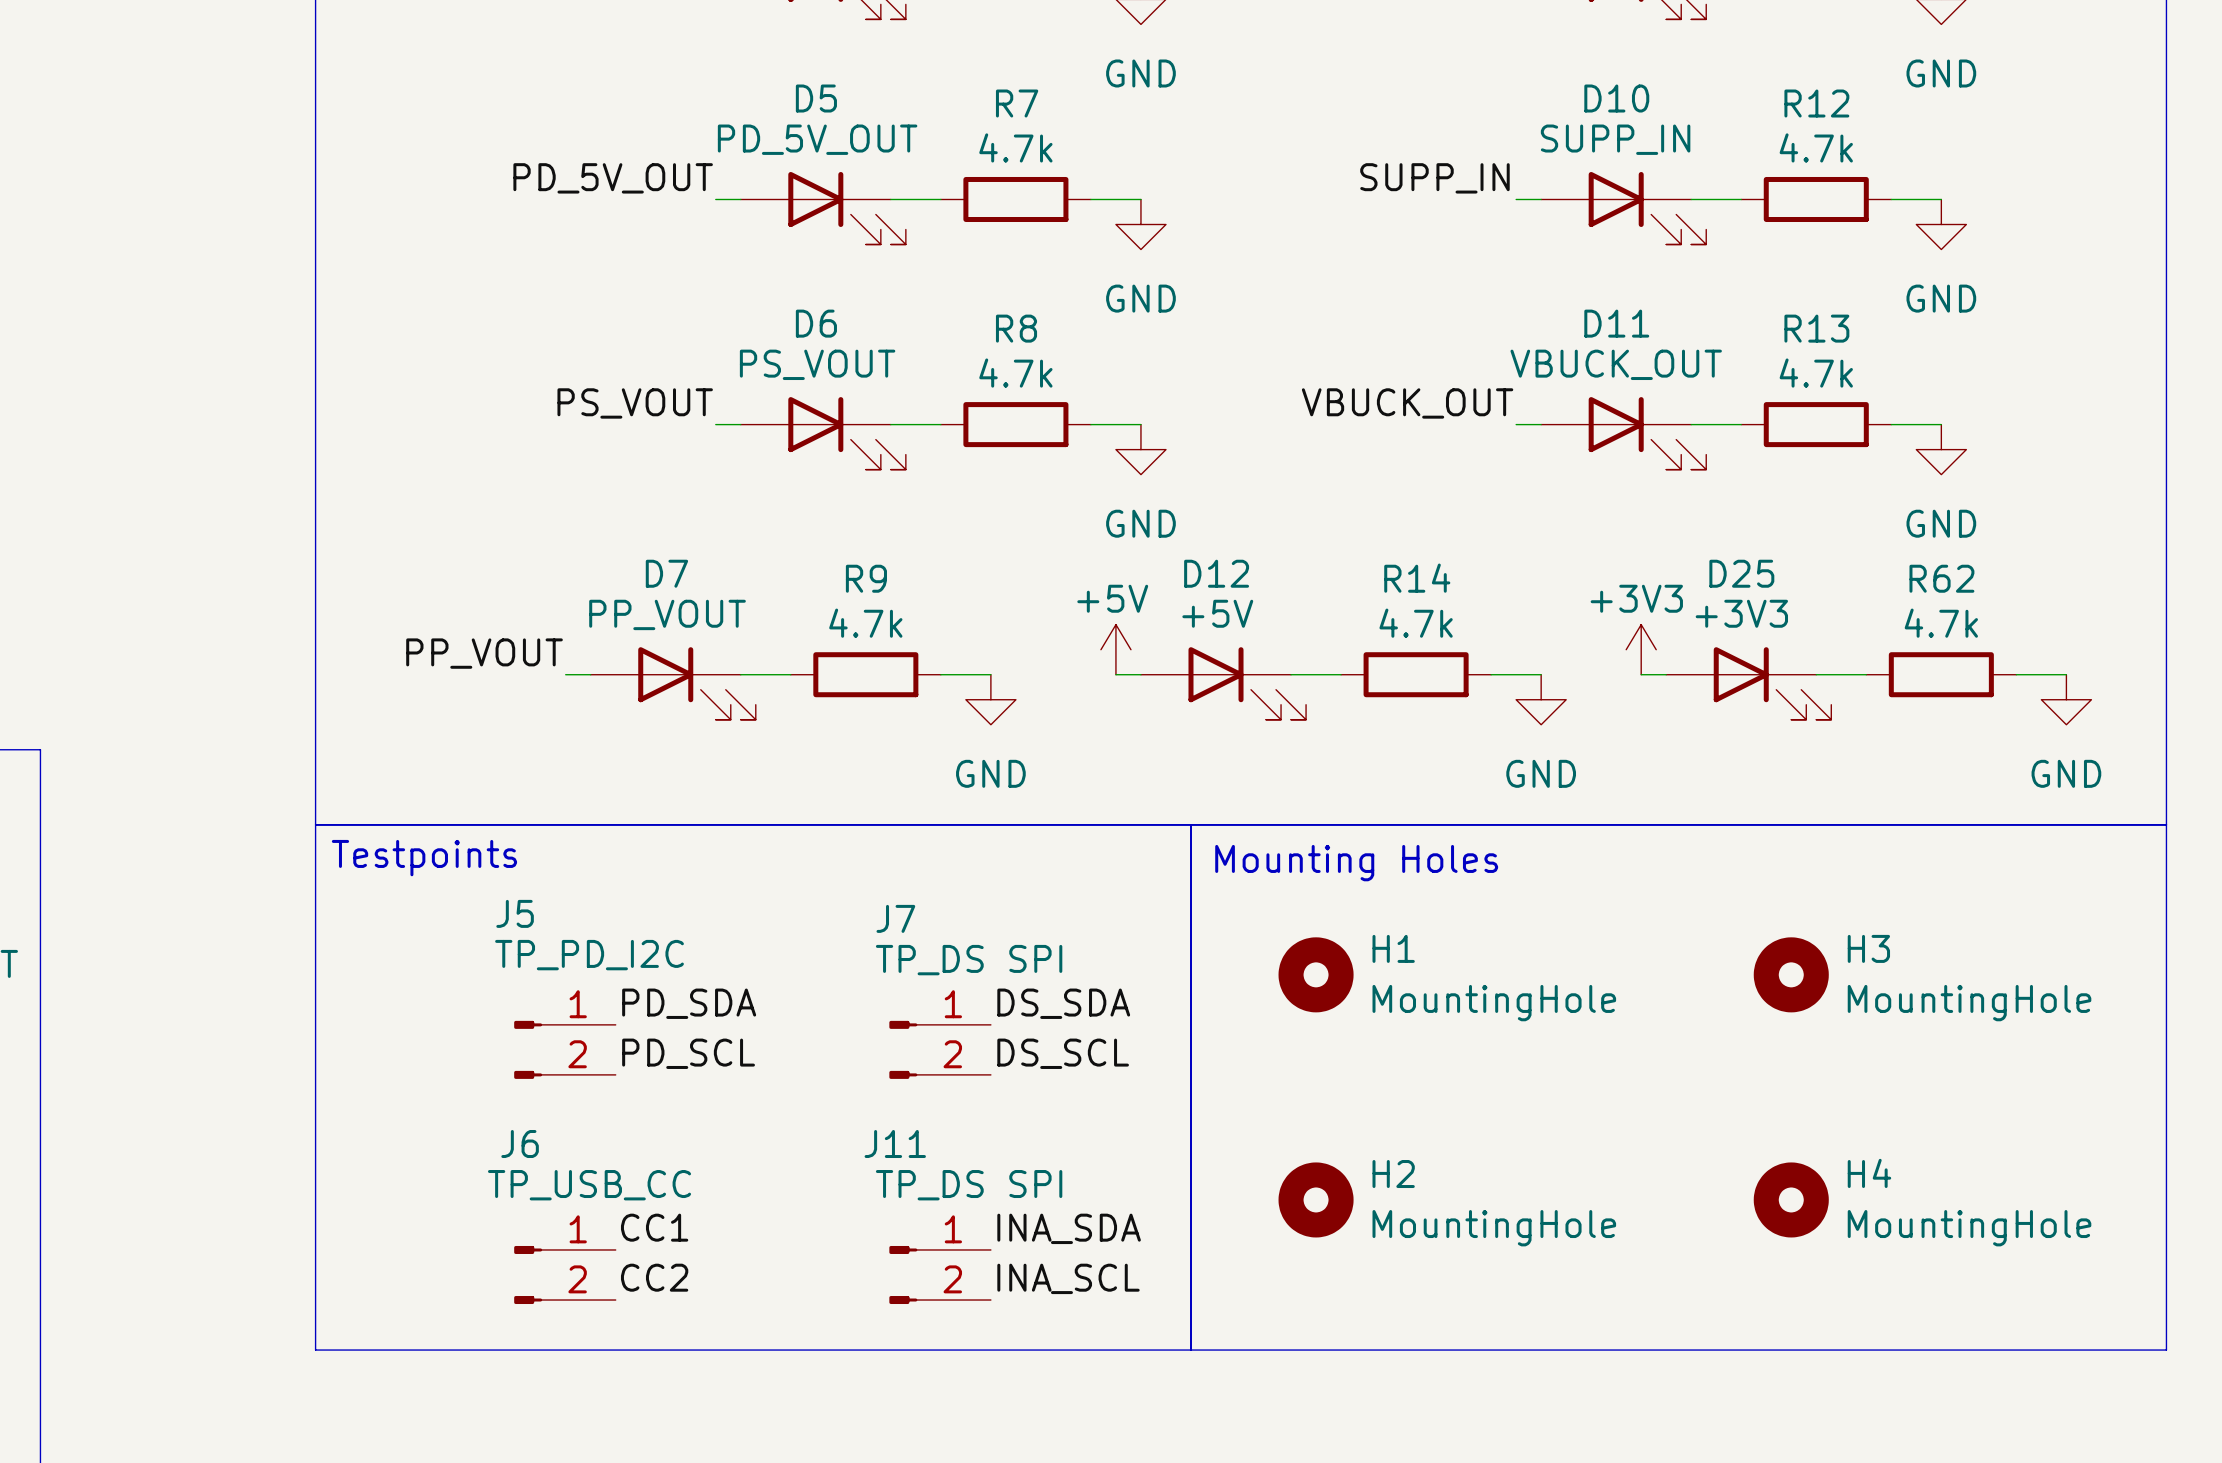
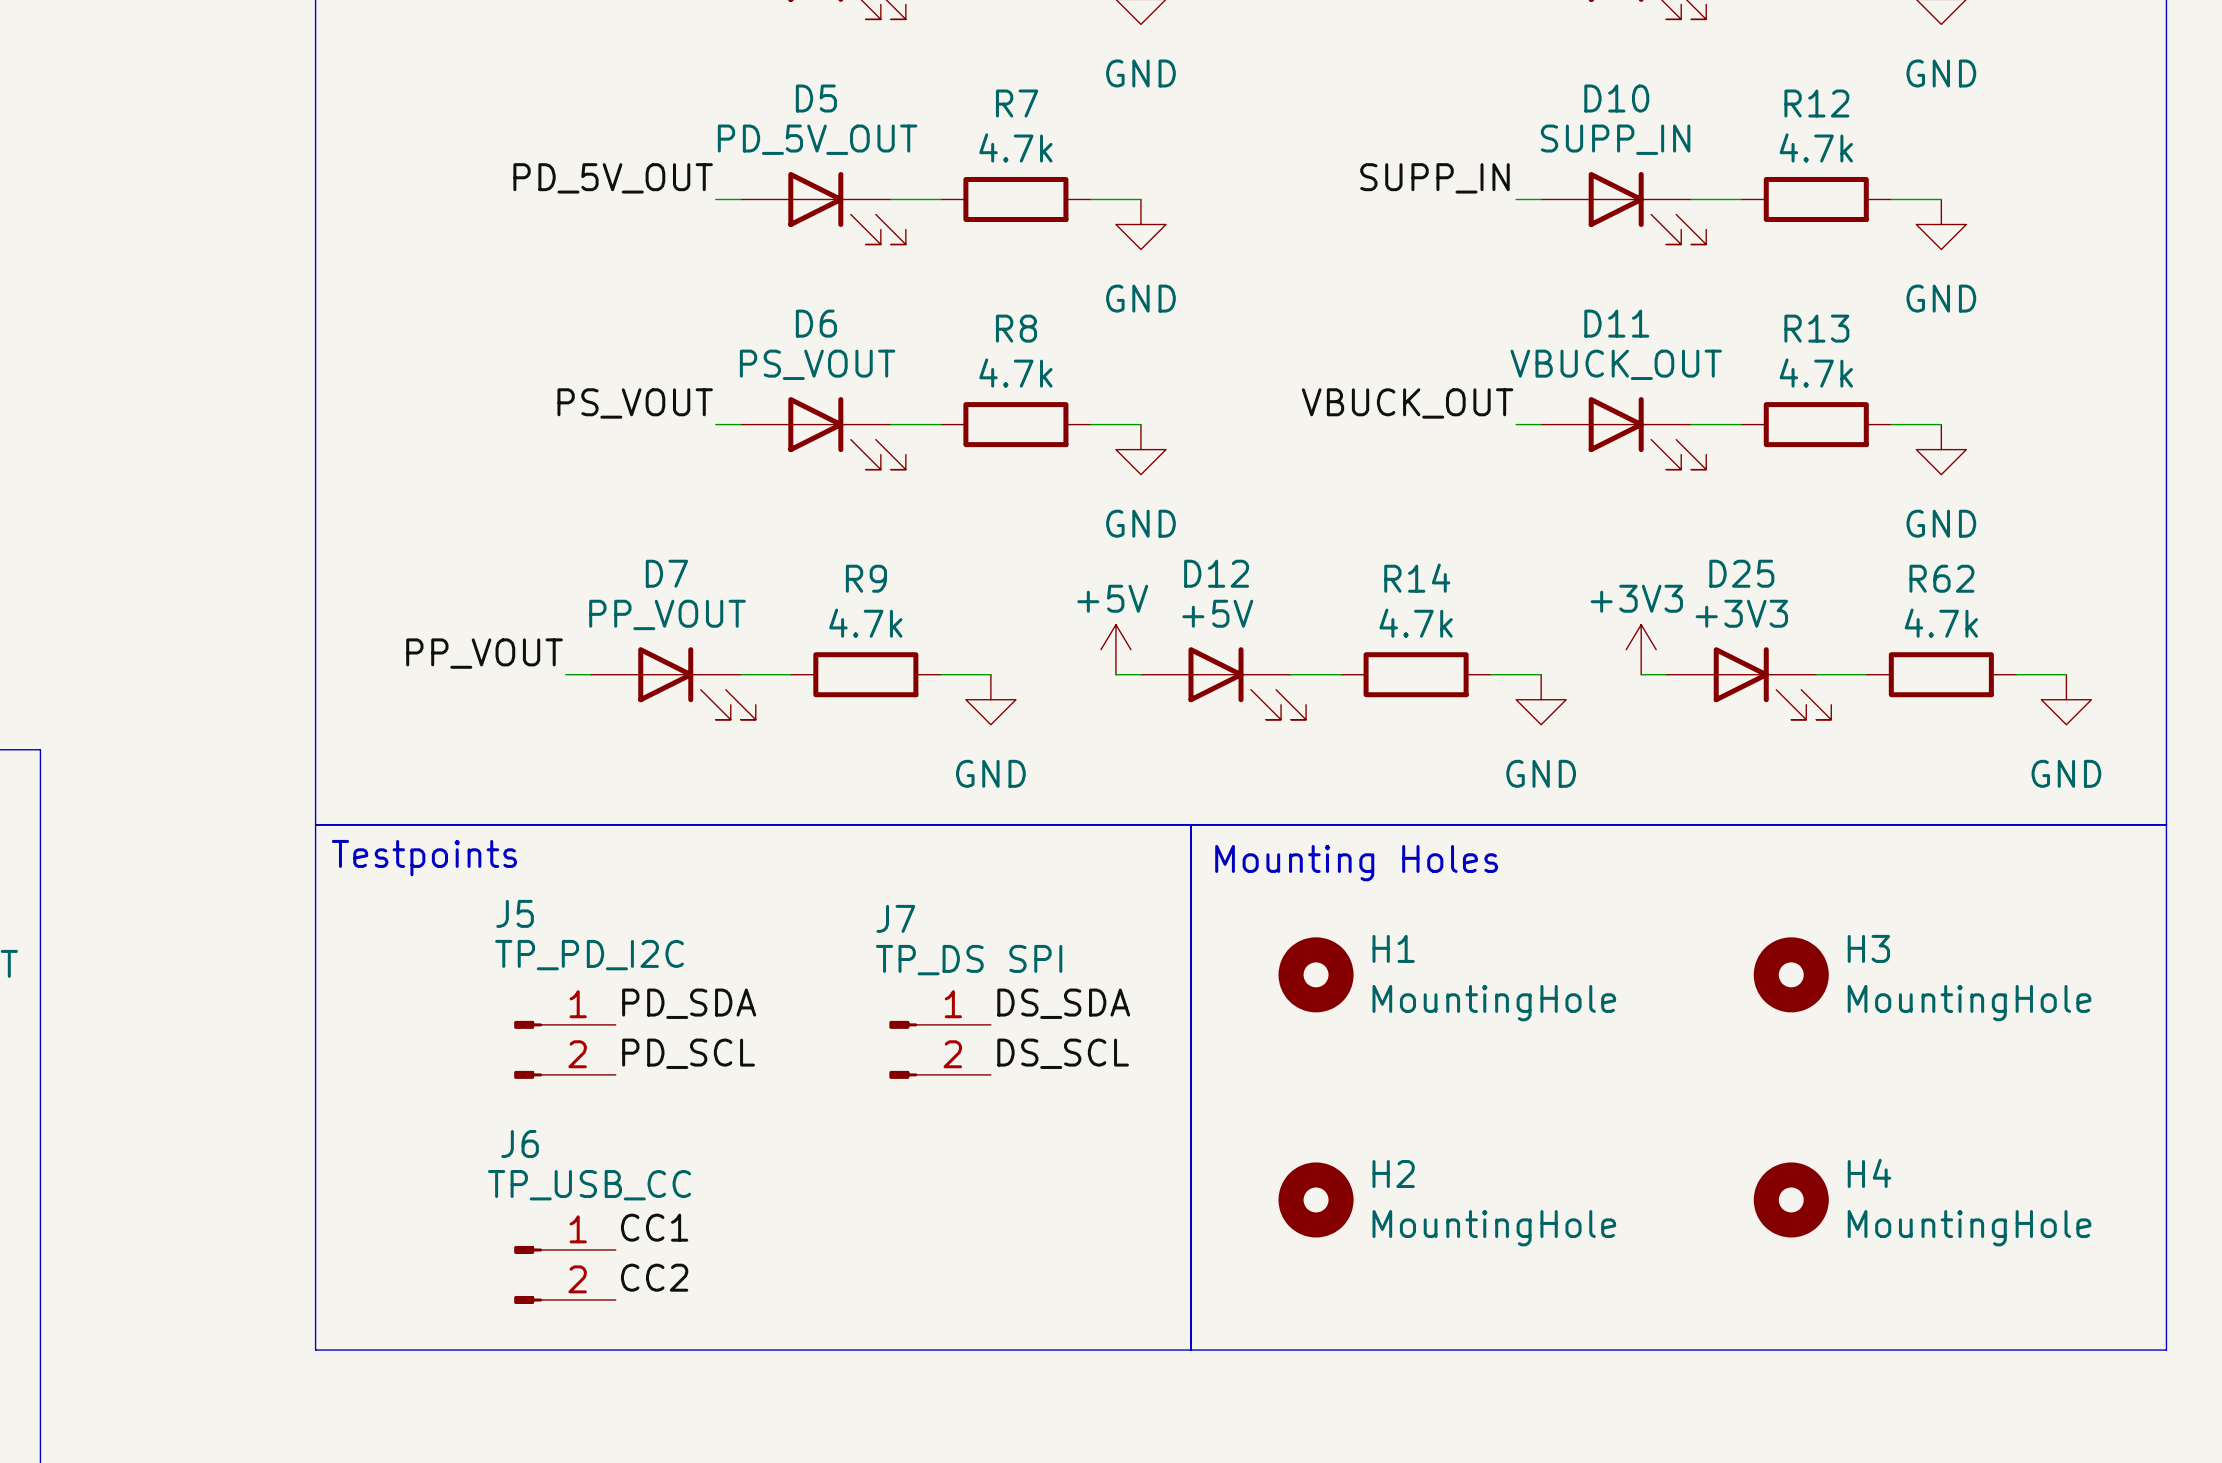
label: INA_SDA (1069, 1228) -> none
J11: TP_DS SPI (940, 1274) -> none
label: INA_SCL (1068, 1278) -> none

